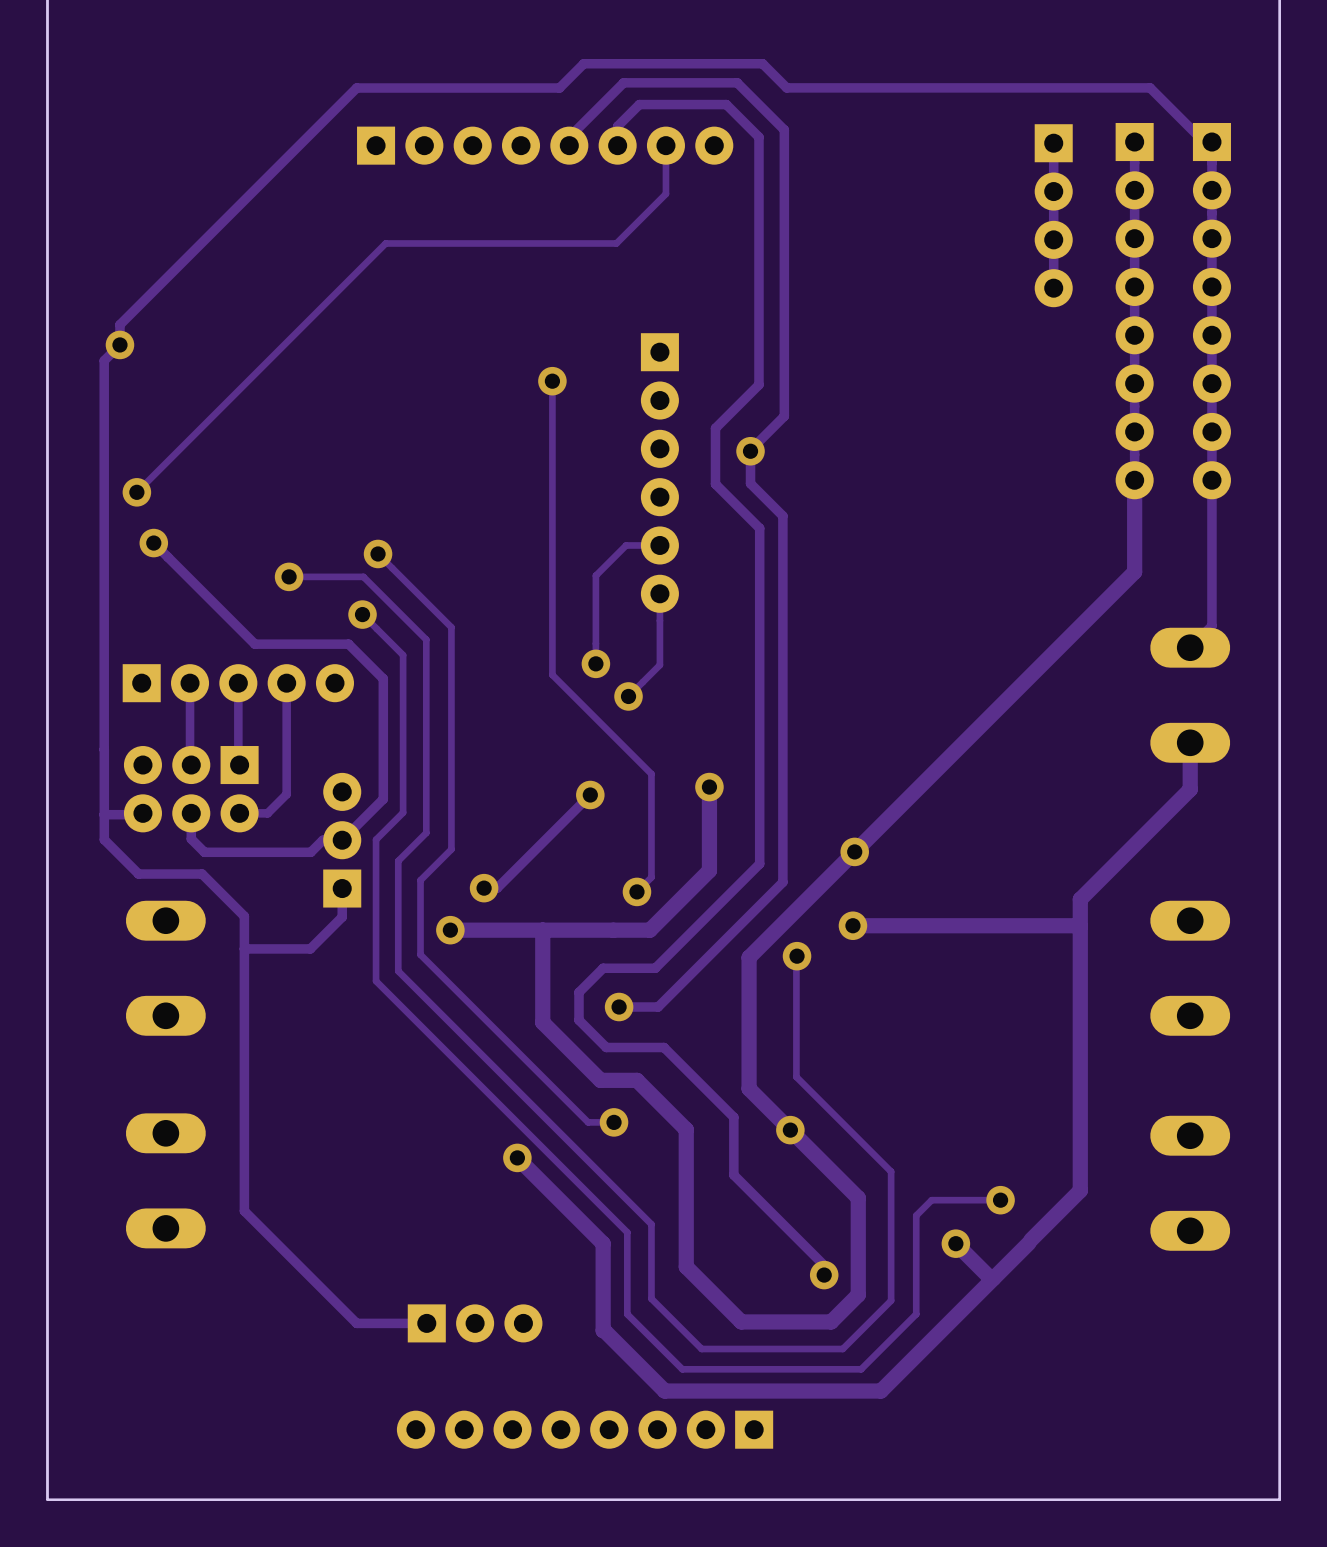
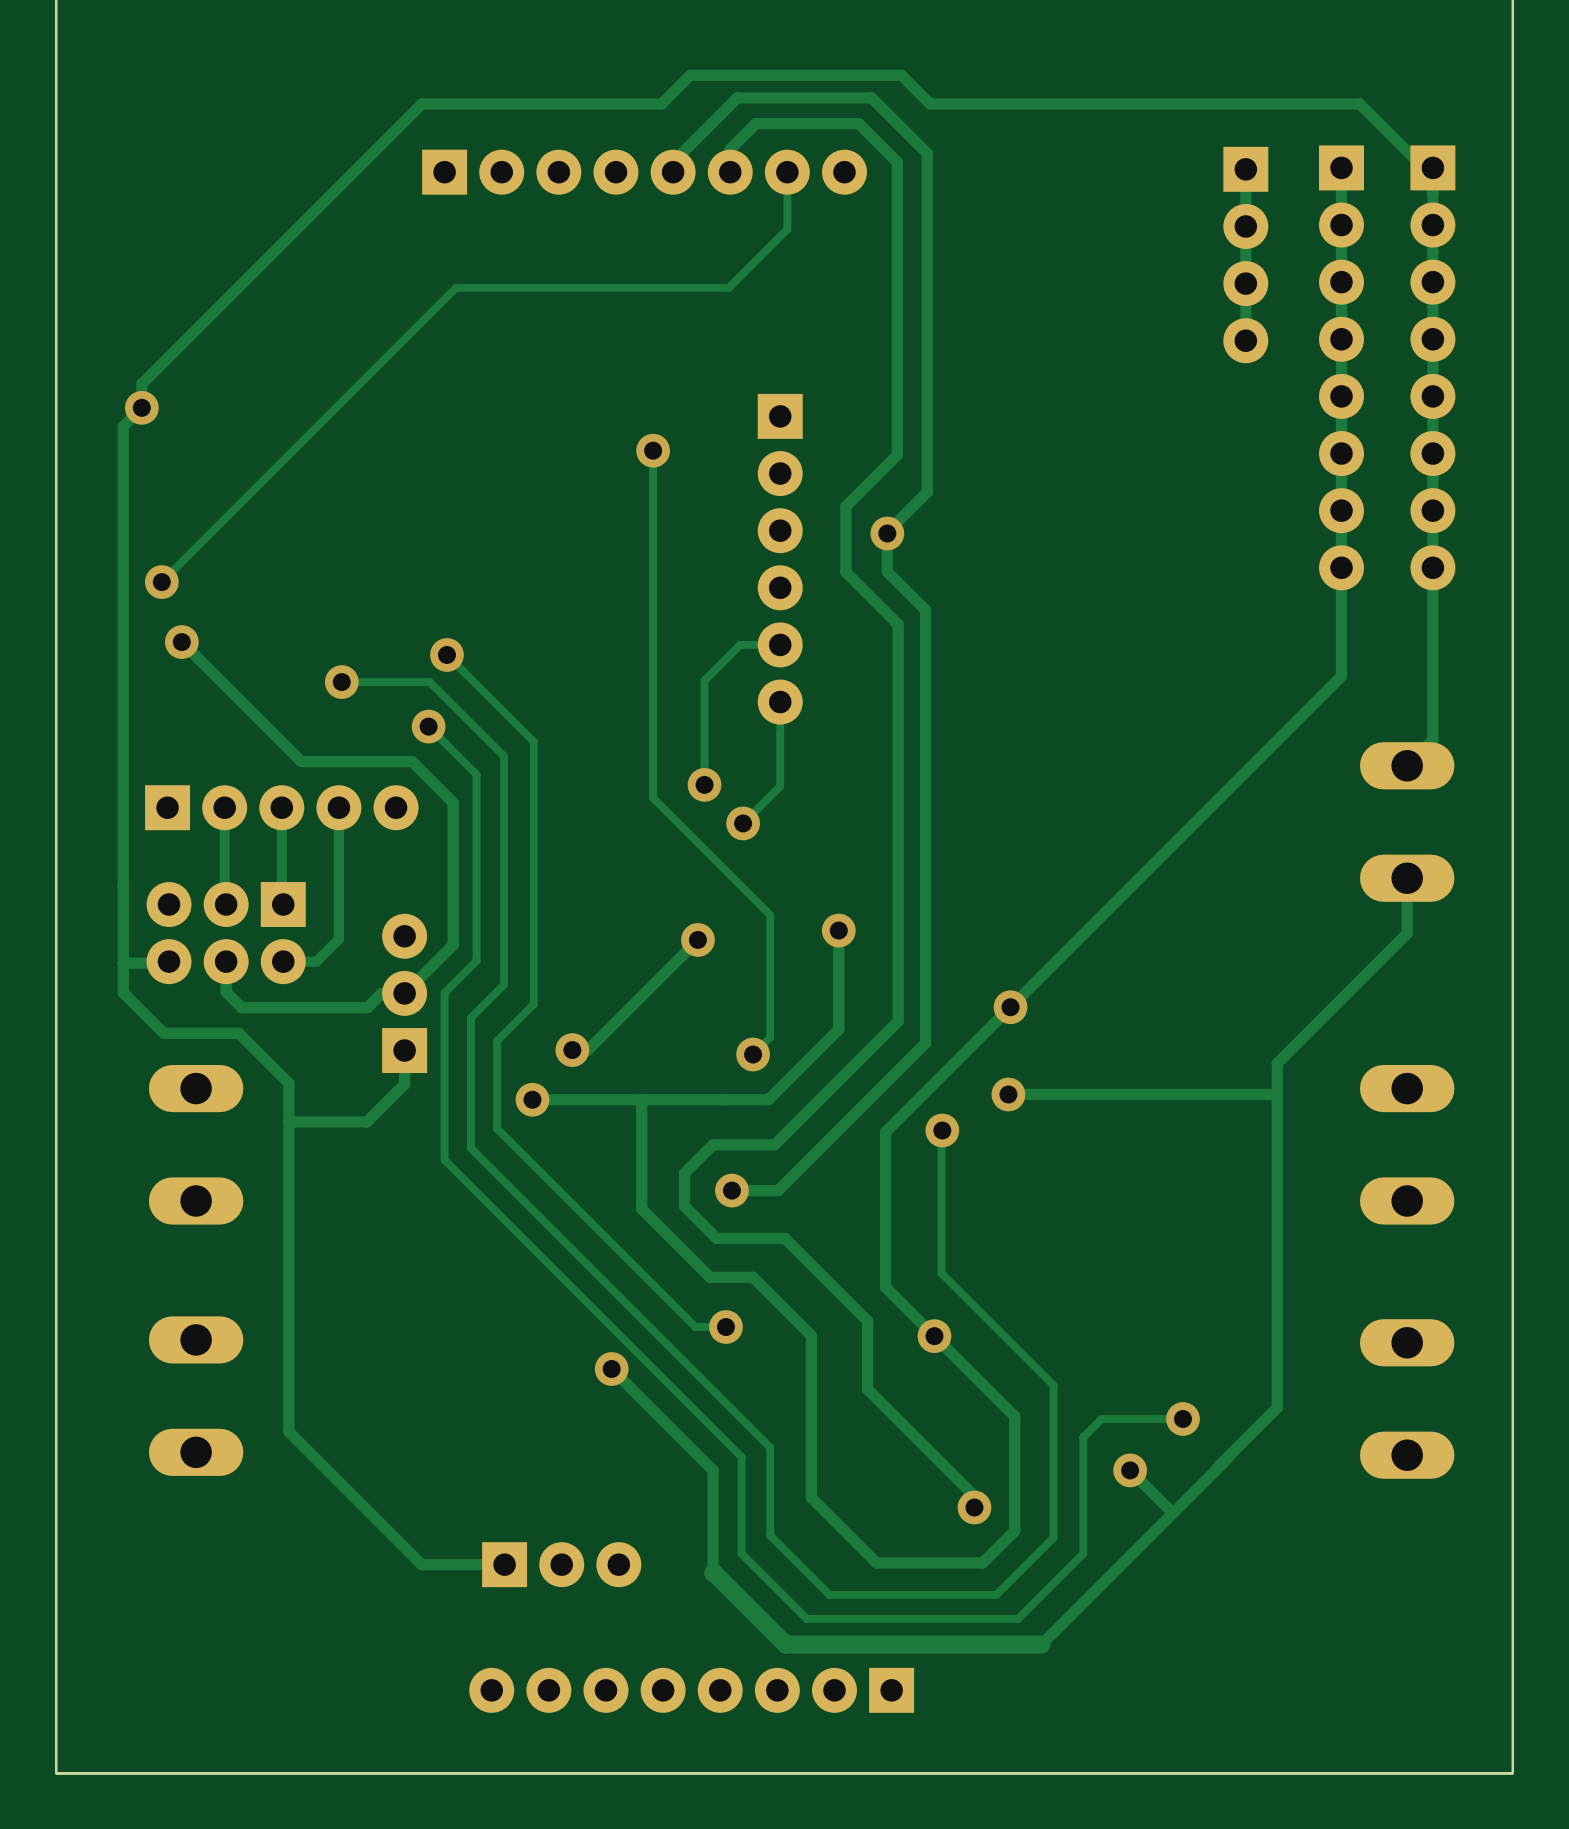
track width: thick (1134, 480) (1134, 571) (749, 957) (749, 1088) (858, 1198) (858, 1294) (831, 1321) (741, 1321) (686, 1266) (686, 1129) (636, 1080) (600, 1080) (542, 1022) (542, 930) -> thin (1341, 567) (1341, 676) (885, 1132) (885, 1287) (1014, 1416) (1014, 1530) (982, 1562) (876, 1562) (811, 1497) (811, 1335) (753, 1277) (710, 1277) (641, 1208) (641, 1099)
track width: thick (1190, 742) (1190, 789) (1080, 899) (1080, 1190) (1030, 1240) -> thin (1407, 878) (1407, 933) (1277, 1063) (1277, 1407) (1218, 1466)
track width: thick (709, 787) (709, 870) (649, 930) (450, 930) -> thin (838, 930) (838, 1029) (768, 1099) (532, 1099)
track width: thick (1079, 925) (852, 925) -> thin (1276, 1094) (1008, 1094)
track width: thick (517, 1157) (603, 1243) (603, 1330) -> thin (611, 1369) (713, 1470) (713, 1573)
track width: thick (955, 1243) (990, 1278) -> thin (1130, 1470) (1171, 1511)
track width: thick (1028, 1243) (880, 1391) -> thin (1216, 1469) (1041, 1644)

